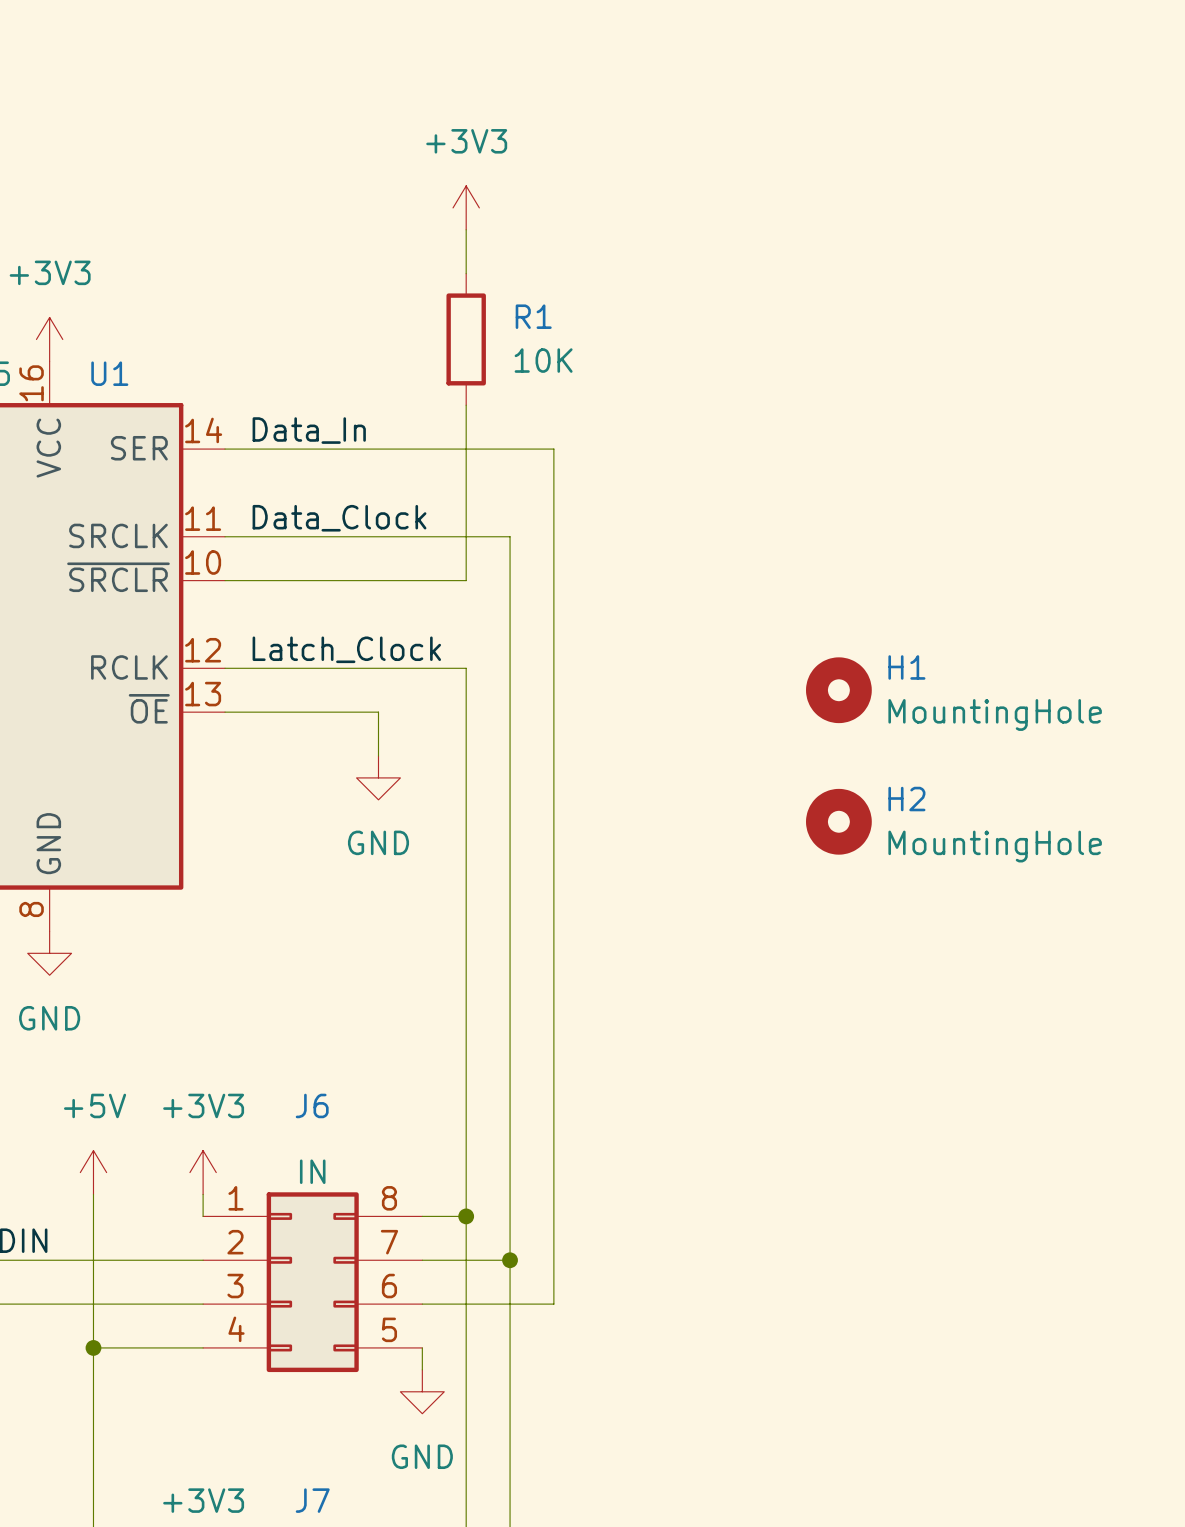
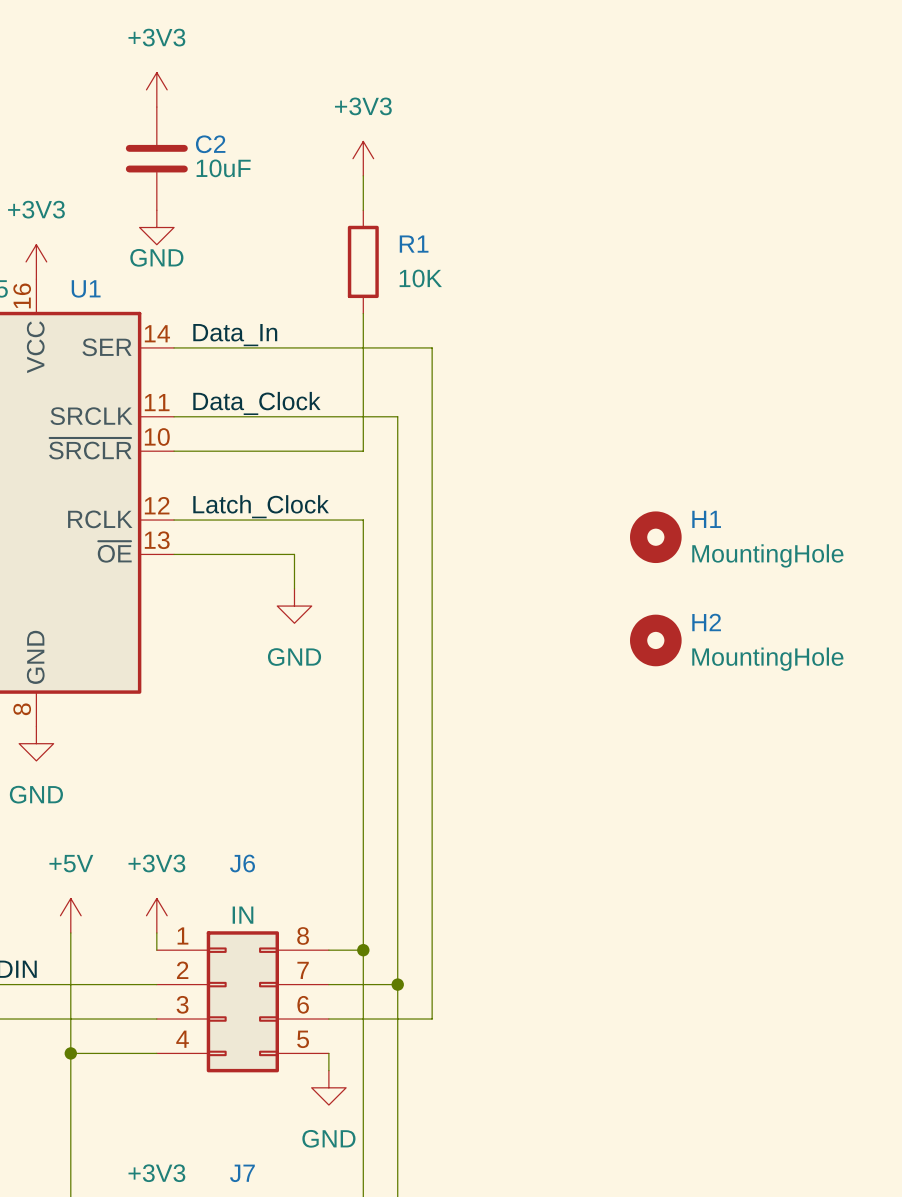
power symbol: none -> +3V3 (156, 89)
C2: none -> 10uF (156, 158)
power symbol: none -> GND (156, 227)

